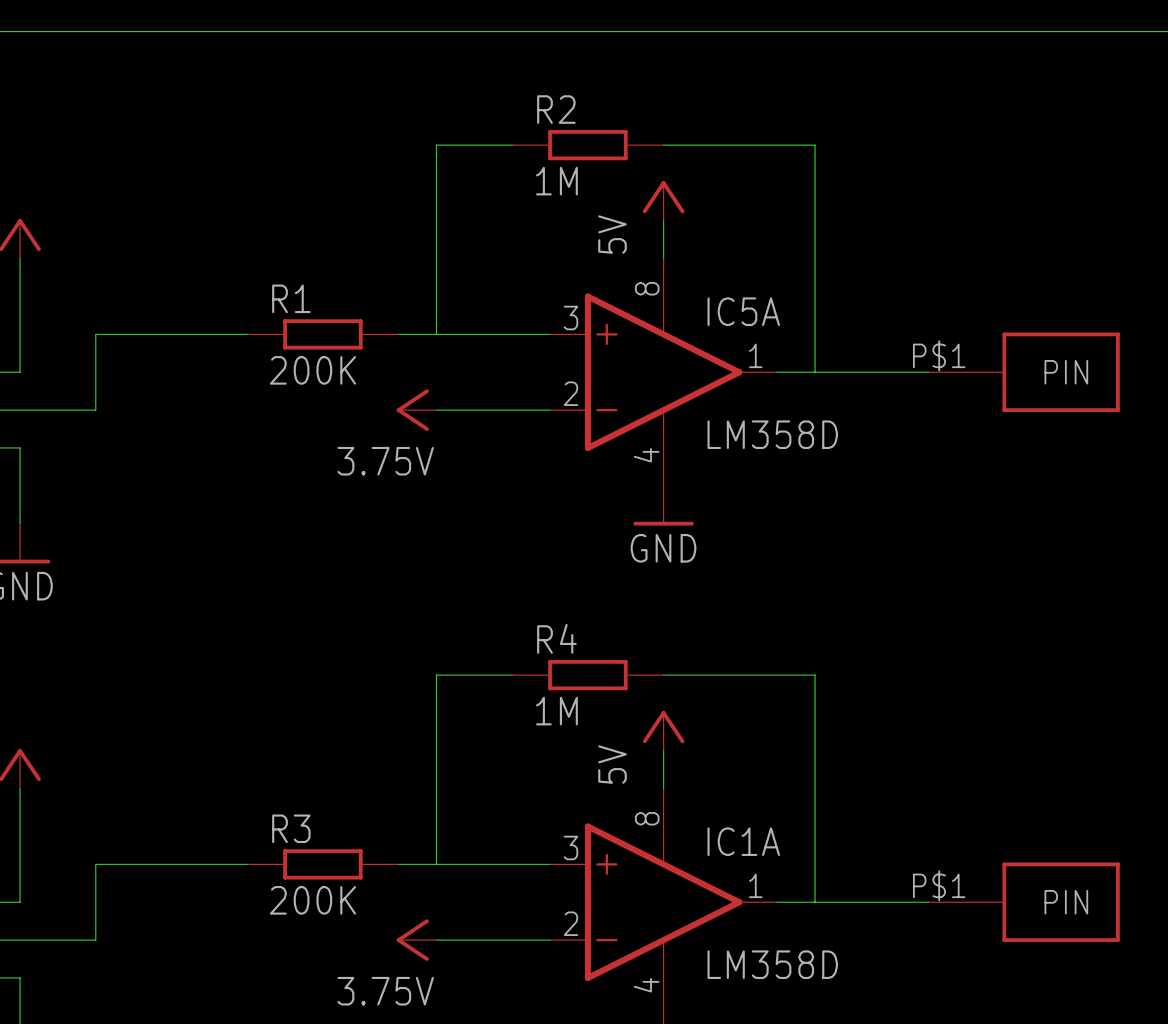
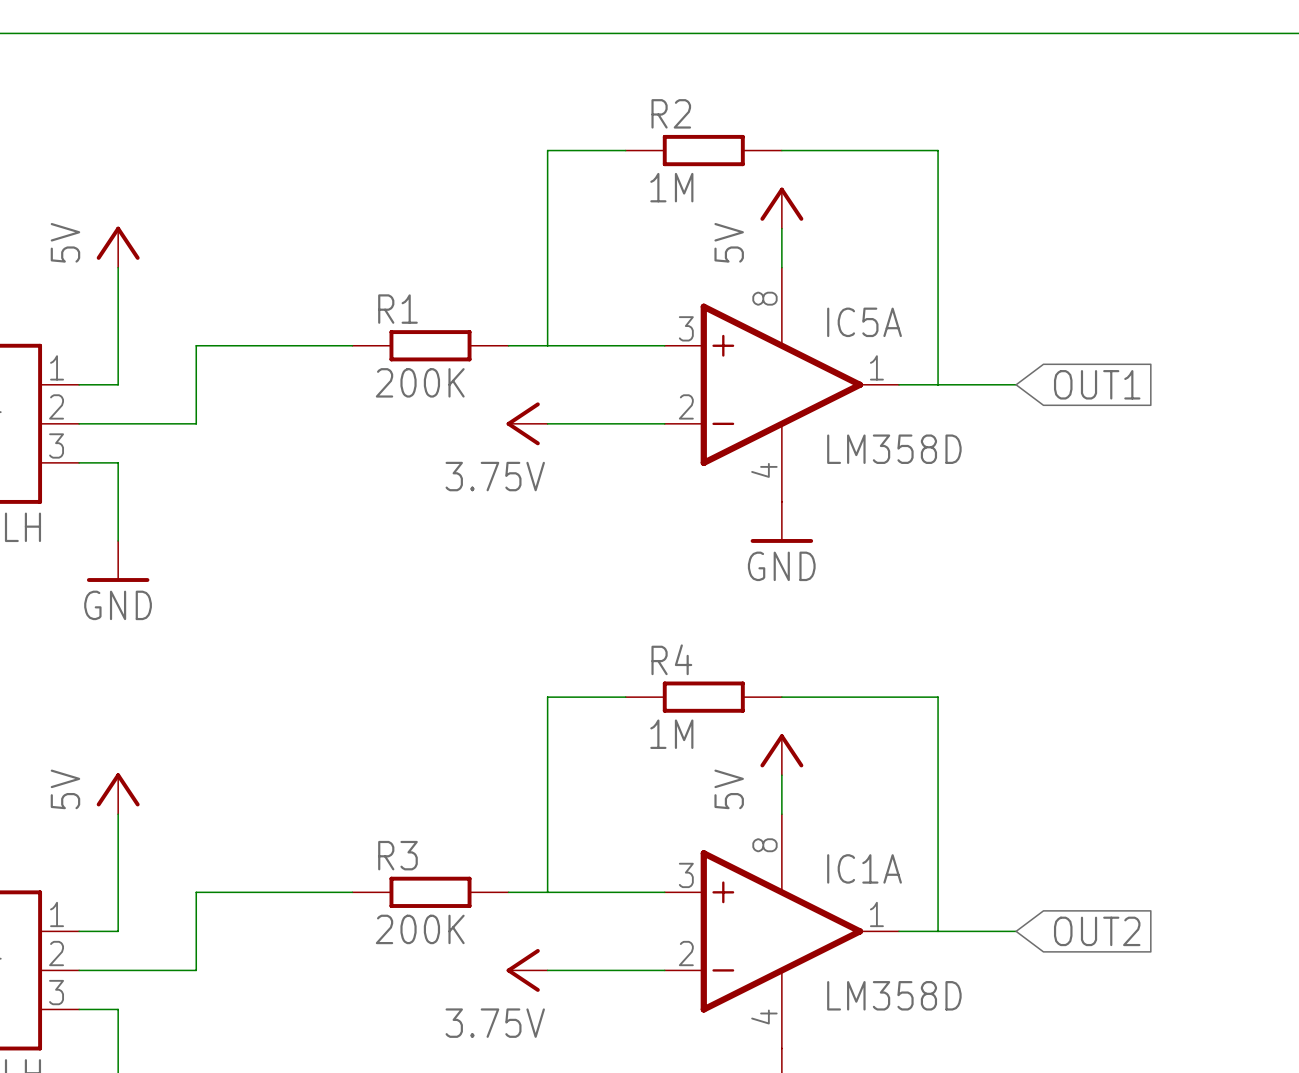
wire: (890, 372) (928, 372) -> none
global label: none -> OUT1 (1097, 384)
part: (1024, 372) -> none
wire: (890, 902) (928, 902) -> none
global label: none -> OUT2 (1097, 931)
part: (1024, 902) -> none

